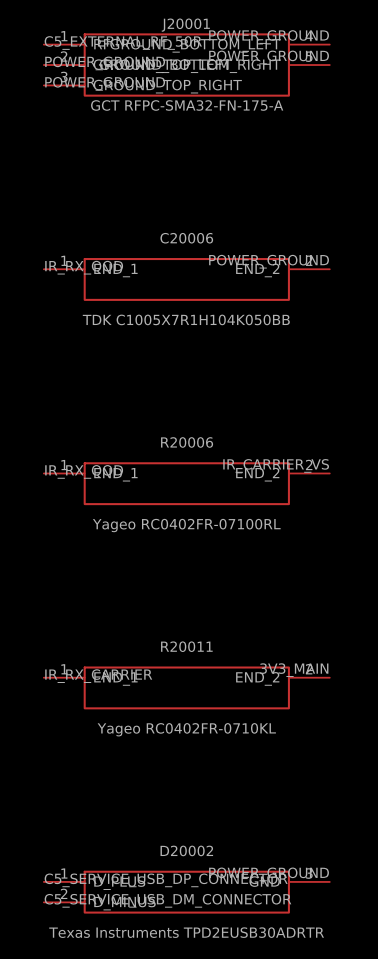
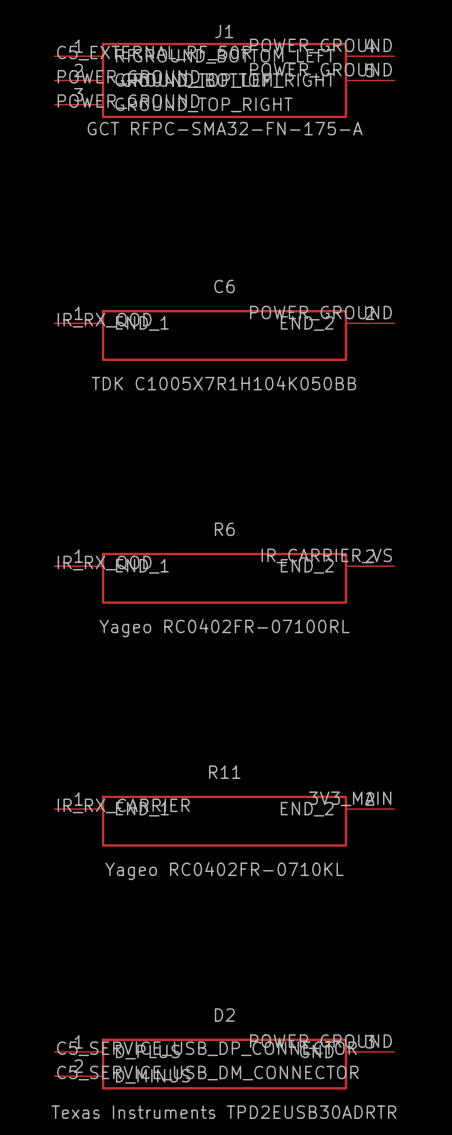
J20001 name: J20001 (185, 25) -> J1 (224, 31)
C20006 name: C20006 (186, 238) -> C6 (224, 286)
R20006 name: R20006 (187, 442) -> R6 (224, 529)
R20011 name: R20011 (186, 646) -> R11 (224, 772)
D20002 name: D20002 (186, 850) -> D2 (224, 1015)

